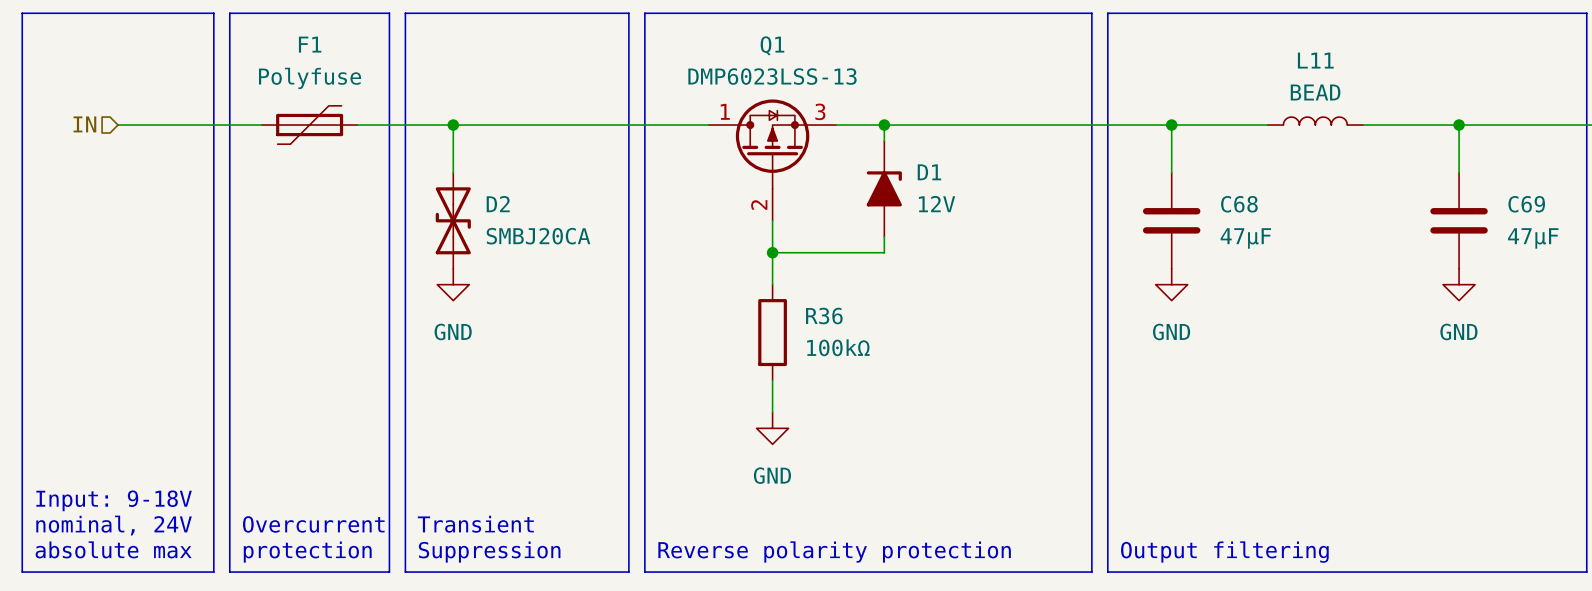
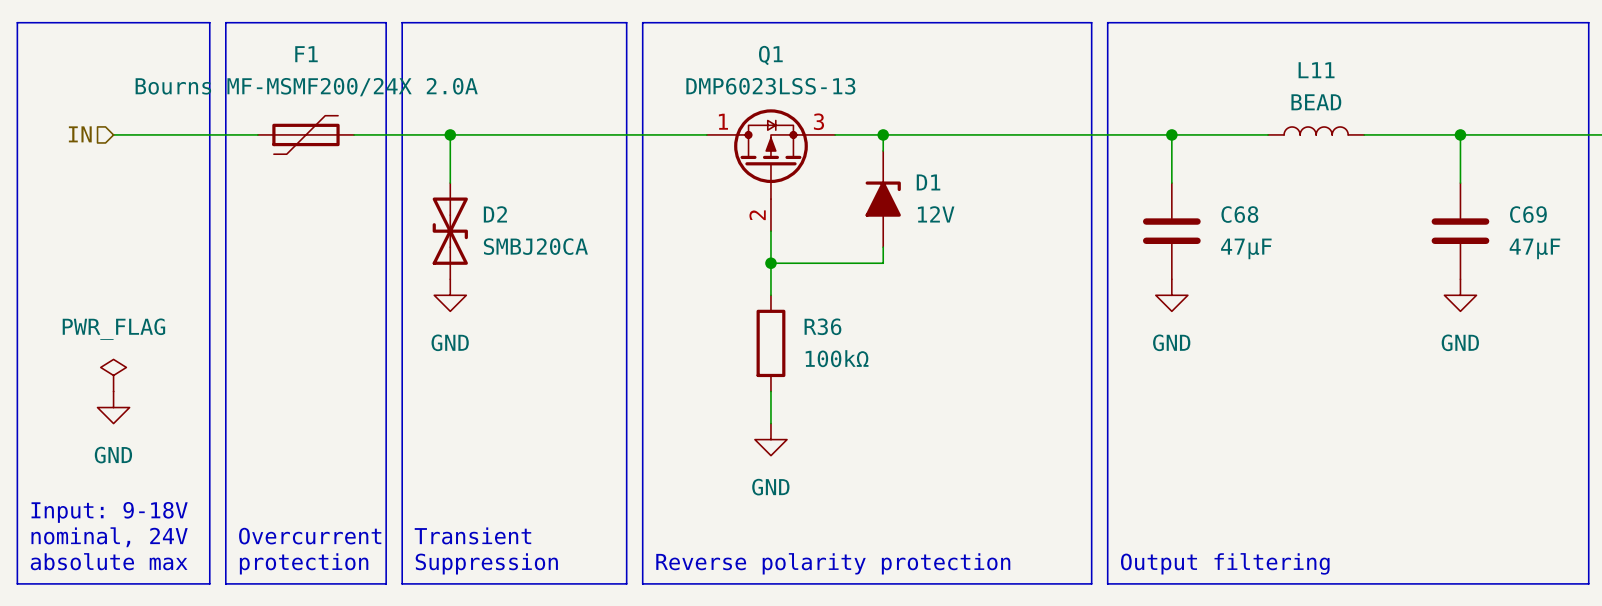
F1 value: Polyfuse (310, 78) -> Bourns MF-MSMF200/24X 2.0A (306, 87)
power symbol: none -> PWR_FLAG (113, 375)
power symbol: none -> GND (113, 407)

